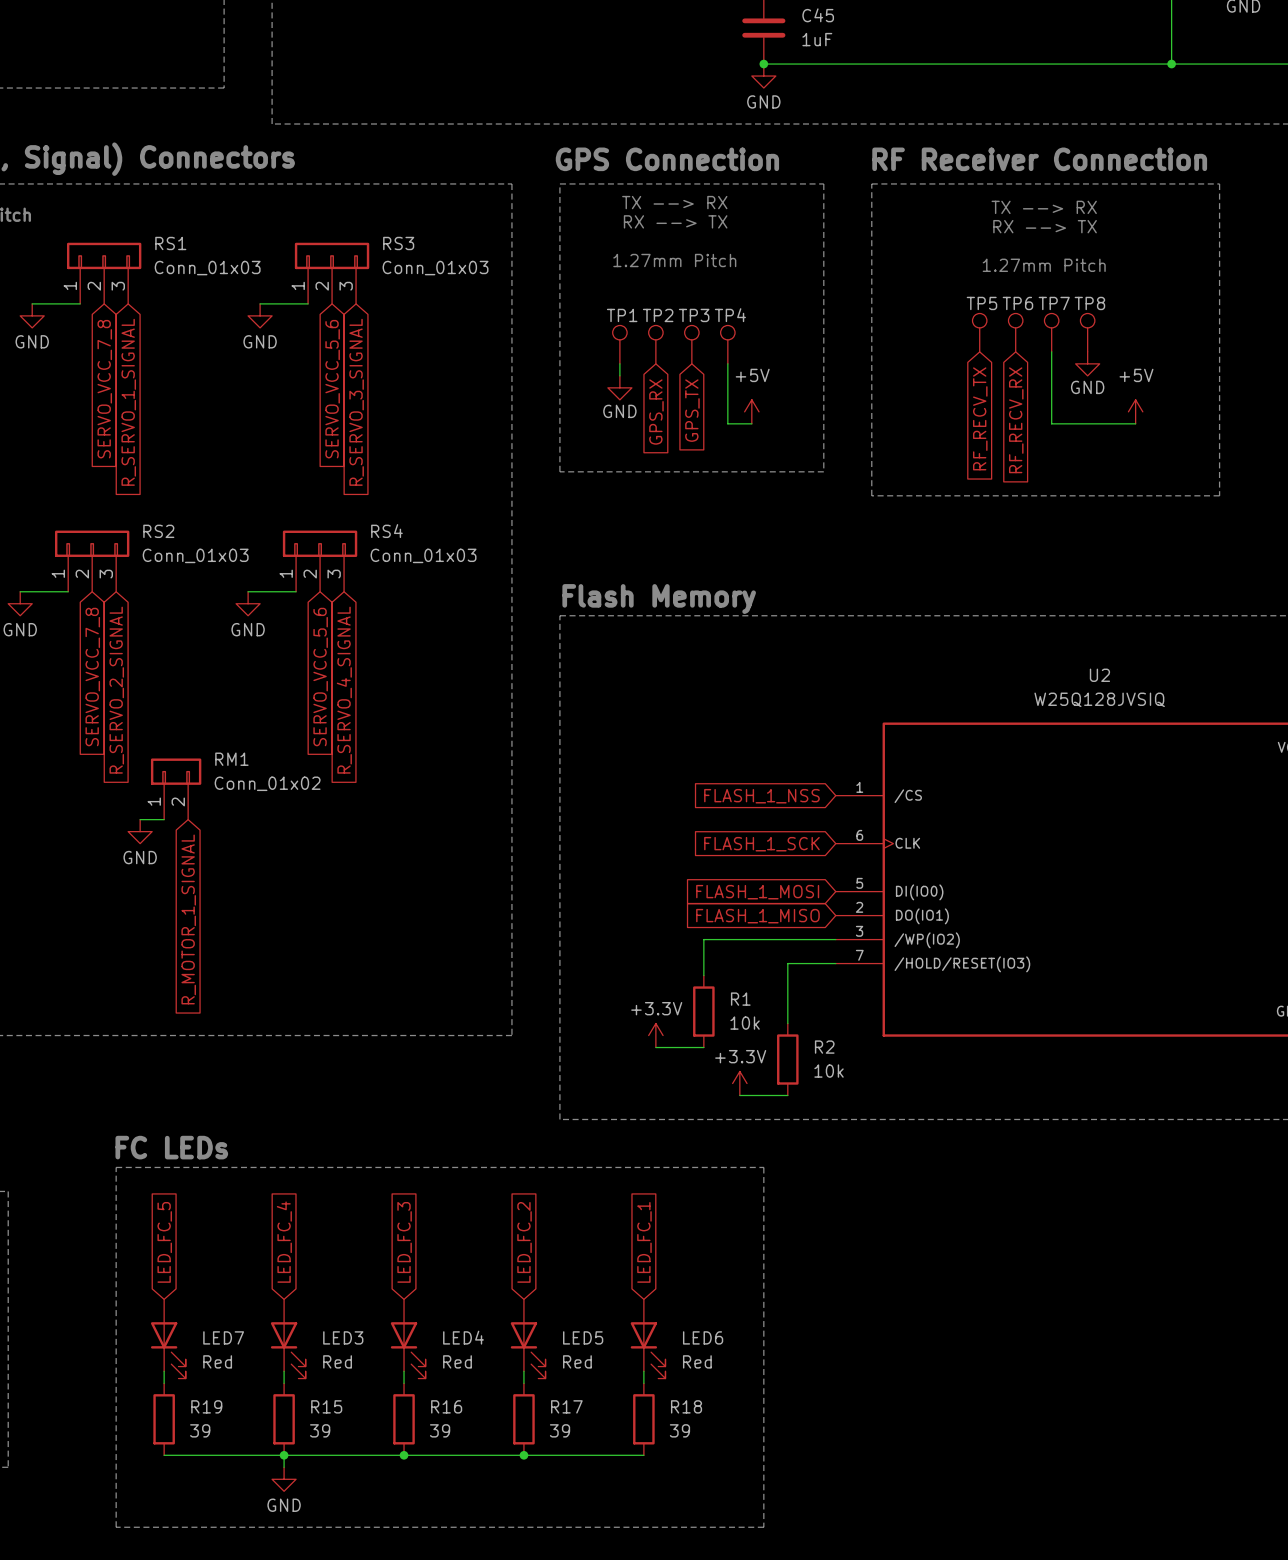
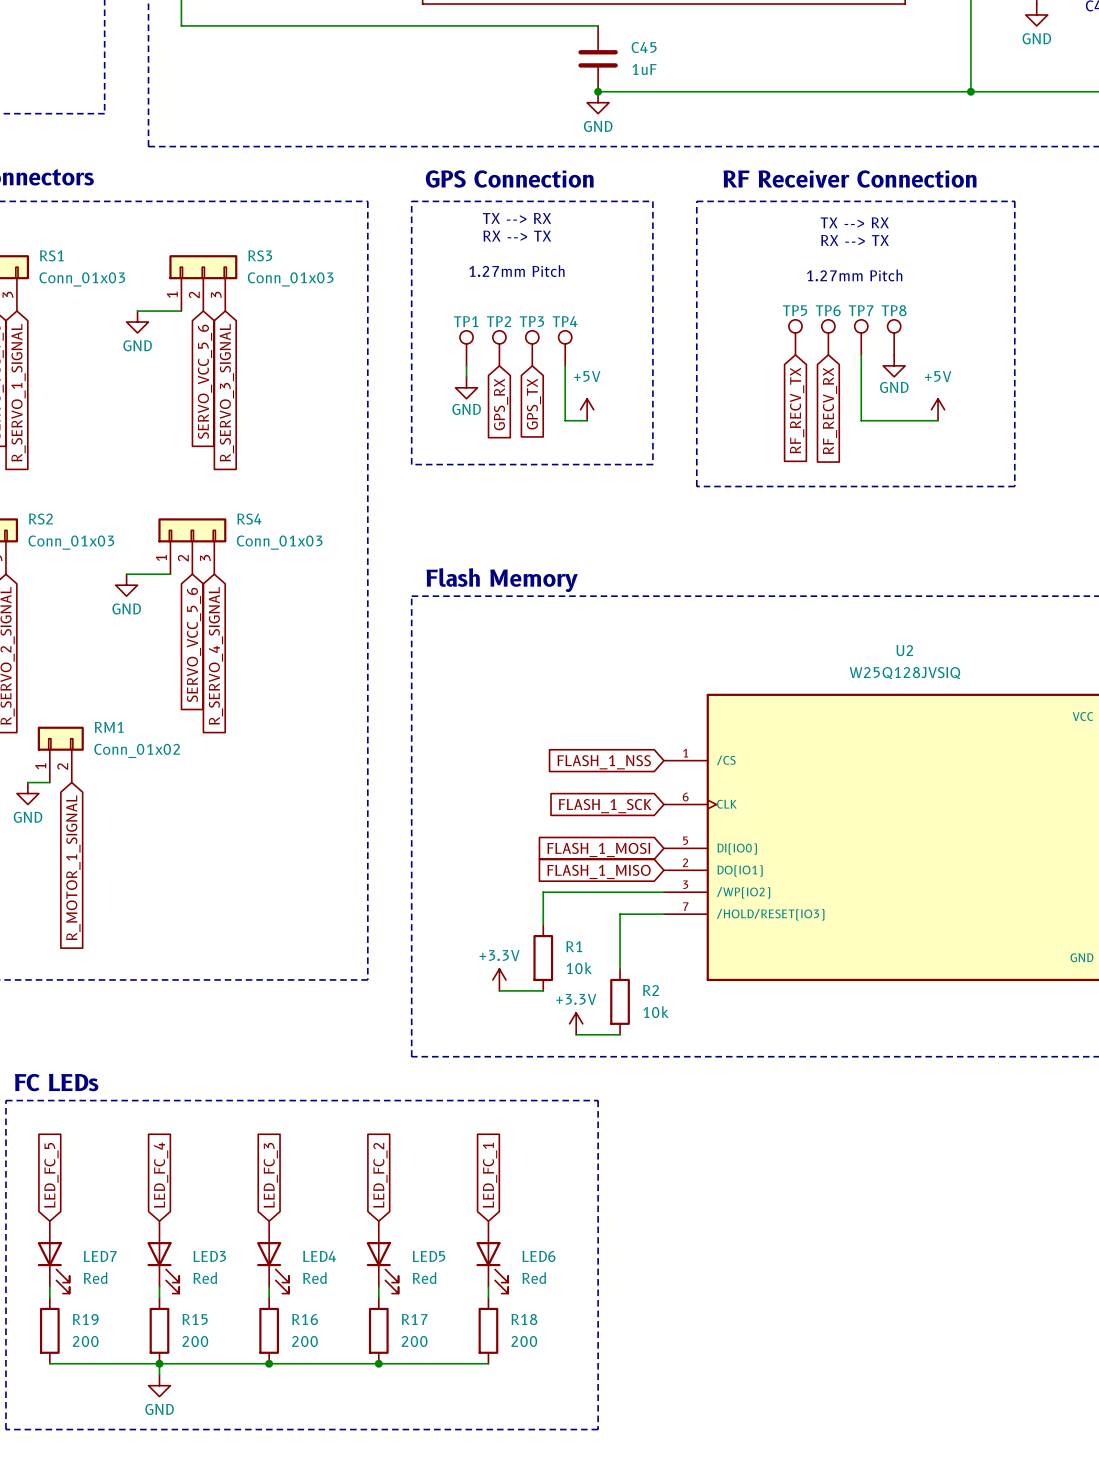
R19 value: 39 (200, 1430) -> 200 (85, 1341)
R15 value: 39 (320, 1430) -> 200 (195, 1341)
R16 value: 39 (440, 1430) -> 200 (305, 1341)
R17 value: 39 (560, 1430) -> 200 (414, 1341)
R18 value: 39 (679, 1430) -> 200 (524, 1341)

